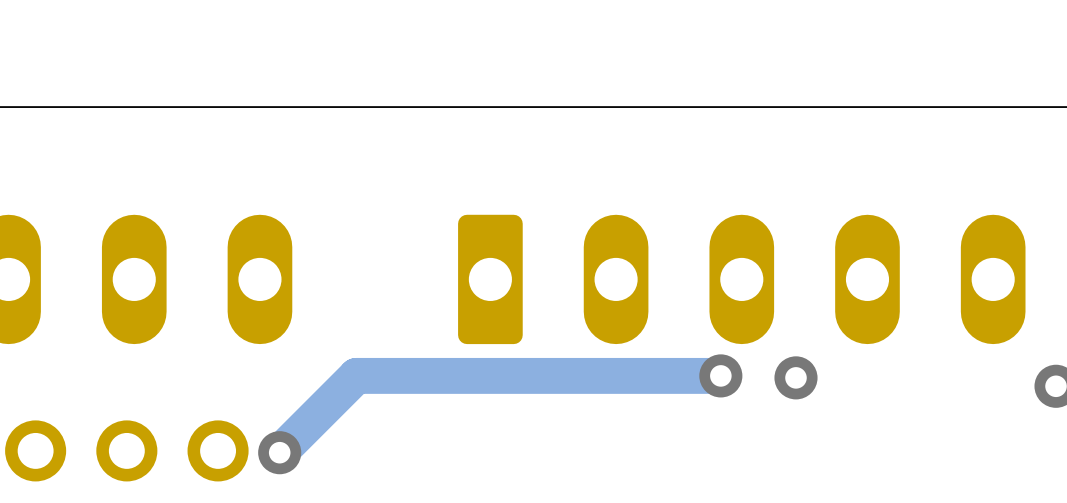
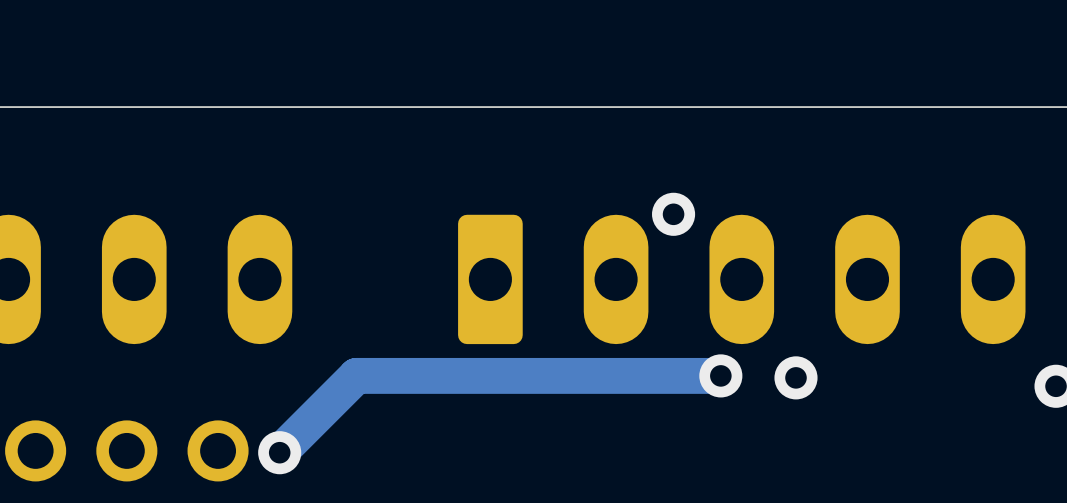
via: none -> (673, 214)

